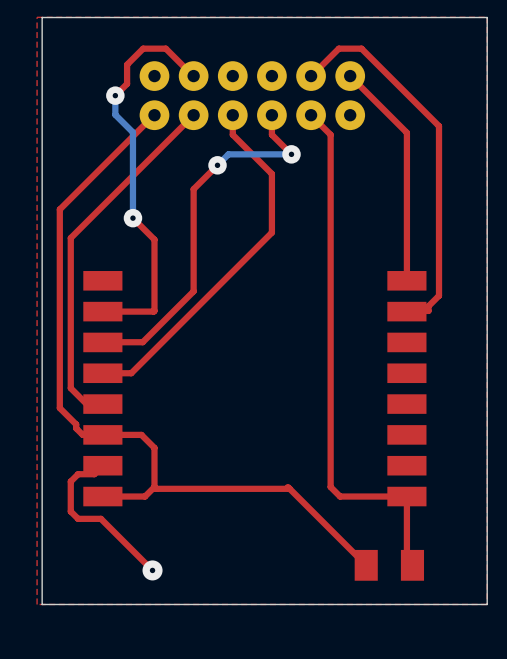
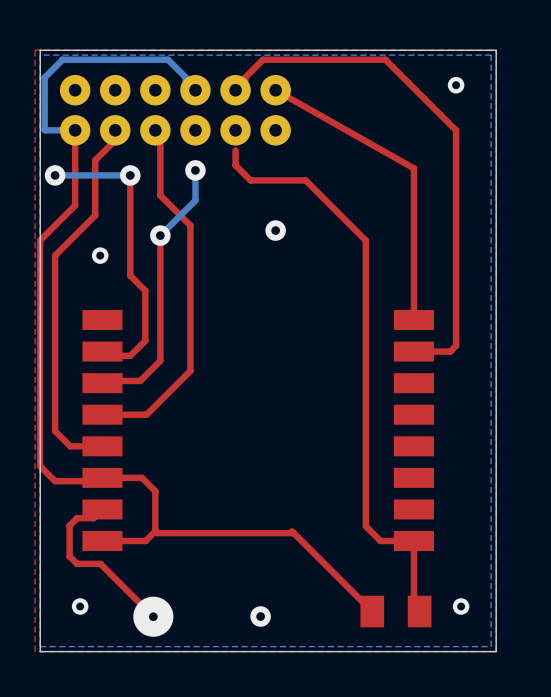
bottom zone outline: none -> (491, 55) (40, 55) (40, 646) (491, 646) (491, 55)
via: none -> (456, 85)
bottom track: none -> (195, 90) (167, 59) (62, 59) (44, 77) (44, 129) (75, 130)
top track: (193, 76) (165, 48) (143, 48) (127, 64) (127, 83) (115, 95) -> none
top track: (311, 76) (338, 48) (361, 48) (439, 126) (439, 295) (428, 306) (428, 310) (406, 311) -> (235, 90) (263, 59) (385, 59) (456, 130) (456, 345) (450, 351) (413, 351)
top track: (350, 76) (406, 132) -> (275, 90) (413, 168)
bottom track: (115, 95) (115, 114) (132, 132) (132, 218) -> none
via: (115, 95) -> none
part position: (252, 95) -> (175, 110)
top track: (154, 115) (59, 209) (59, 408) (76, 424) (76, 428) (82, 434) (102, 434) -> (75, 130) (75, 205) (40, 240) (40, 466) (55, 481) (99, 481) (102, 477)
top track: (193, 115) (70, 238) (70, 388) (91, 408) (98, 408) (102, 404) -> (115, 130) (115, 140) (95, 160) (95, 215) (55, 255) (55, 431) (70, 446) (102, 446)
top track: (271, 115) (271, 134) (291, 154) -> none
top track: (311, 115) (330, 134) (330, 487) (340, 496) (374, 496) -> (235, 165) (250, 180) (305, 180) (365, 240) (365, 526) (380, 541)
top track: (232, 129) (232, 134) (271, 173) (271, 232) (131, 373) -> (155, 130) (160, 135) (160, 195) (190, 225) (190, 370) (146, 414) (131, 414)
bottom track: none -> (195, 170) (195, 200) (160, 235)
via: none -> (195, 170)
via: none -> (55, 175)
bottom track: none -> (130, 175) (55, 175)
via: none -> (130, 175)
bottom track: (291, 154) (228, 154) (217, 165) -> none
via: (291, 154) -> none
top track: (217, 165) (193, 189) (193, 291) (142, 342) (115, 342) -> none
via: (217, 165) -> none
via: none -> (275, 230)
top track: none -> (160, 235) (160, 360) (140, 380) (112, 380) (110, 382)
via: none -> (160, 235)
via: none -> (100, 255)
top track: (132, 218) (154, 239) (154, 310) (102, 311) -> (130, 175) (130, 275) (145, 290) (145, 340) (130, 355) (106, 355) (102, 351)
via: (132, 218) -> none
via: none -> (80, 606)
via size: [142, 560, 163, 581] -> [133, 596, 174, 637]
via: none -> (461, 606)
via: none -> (260, 616)

